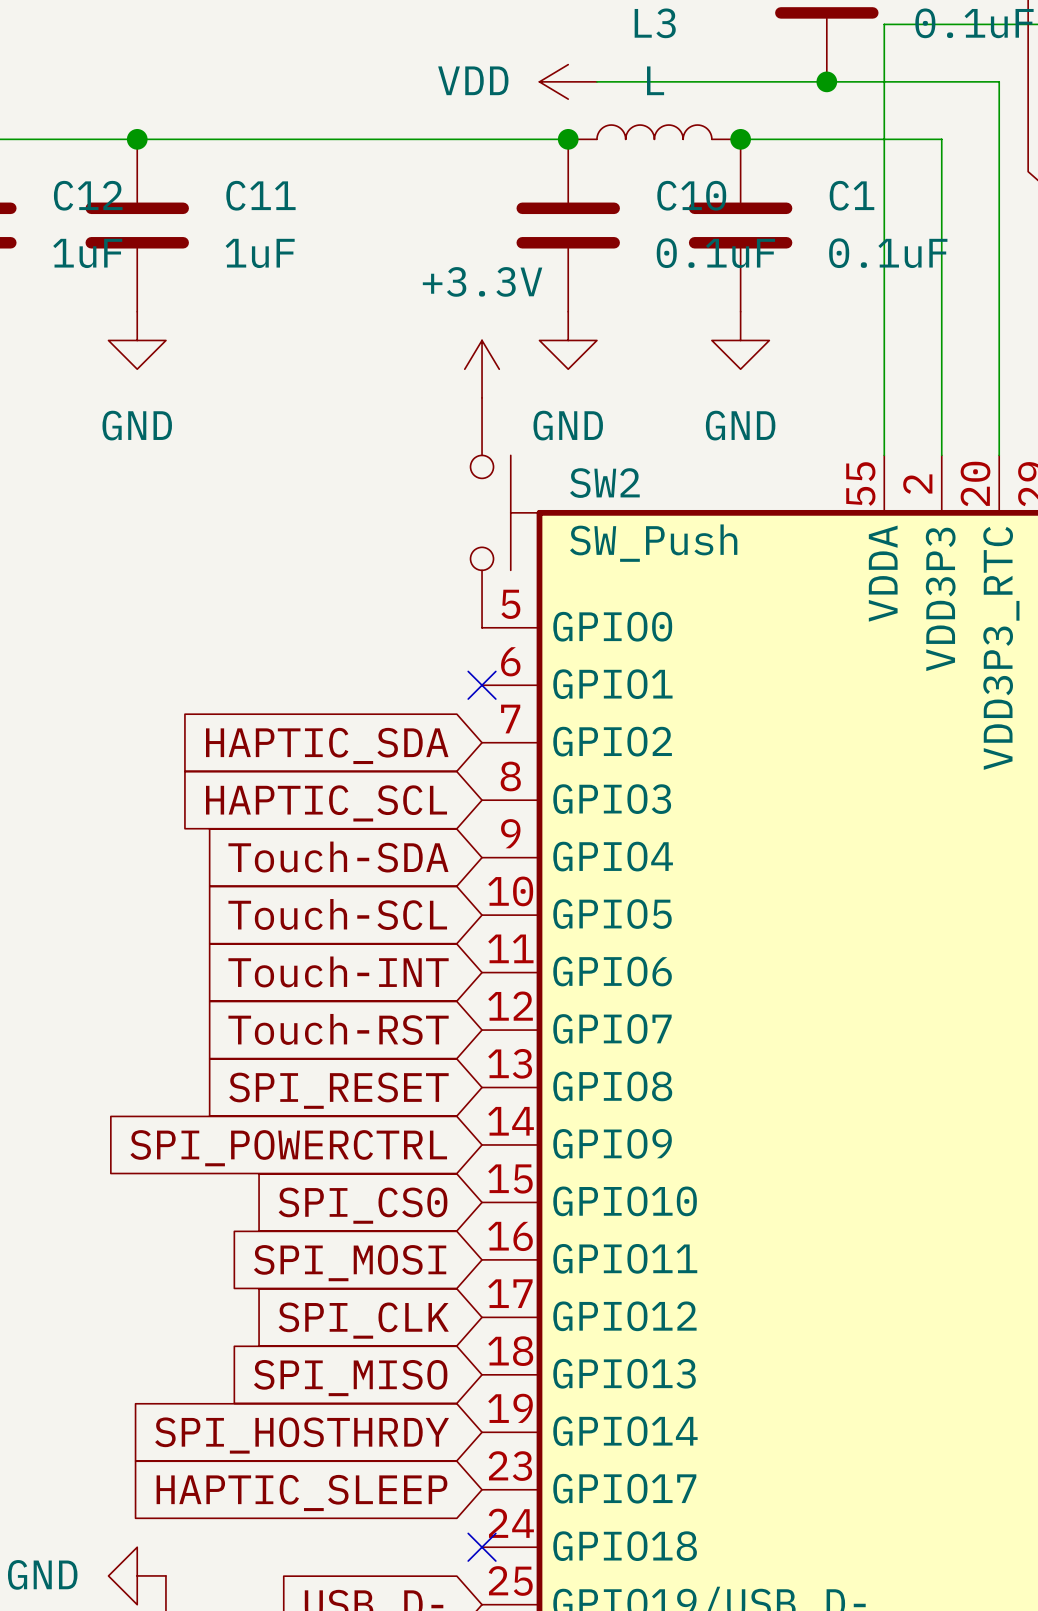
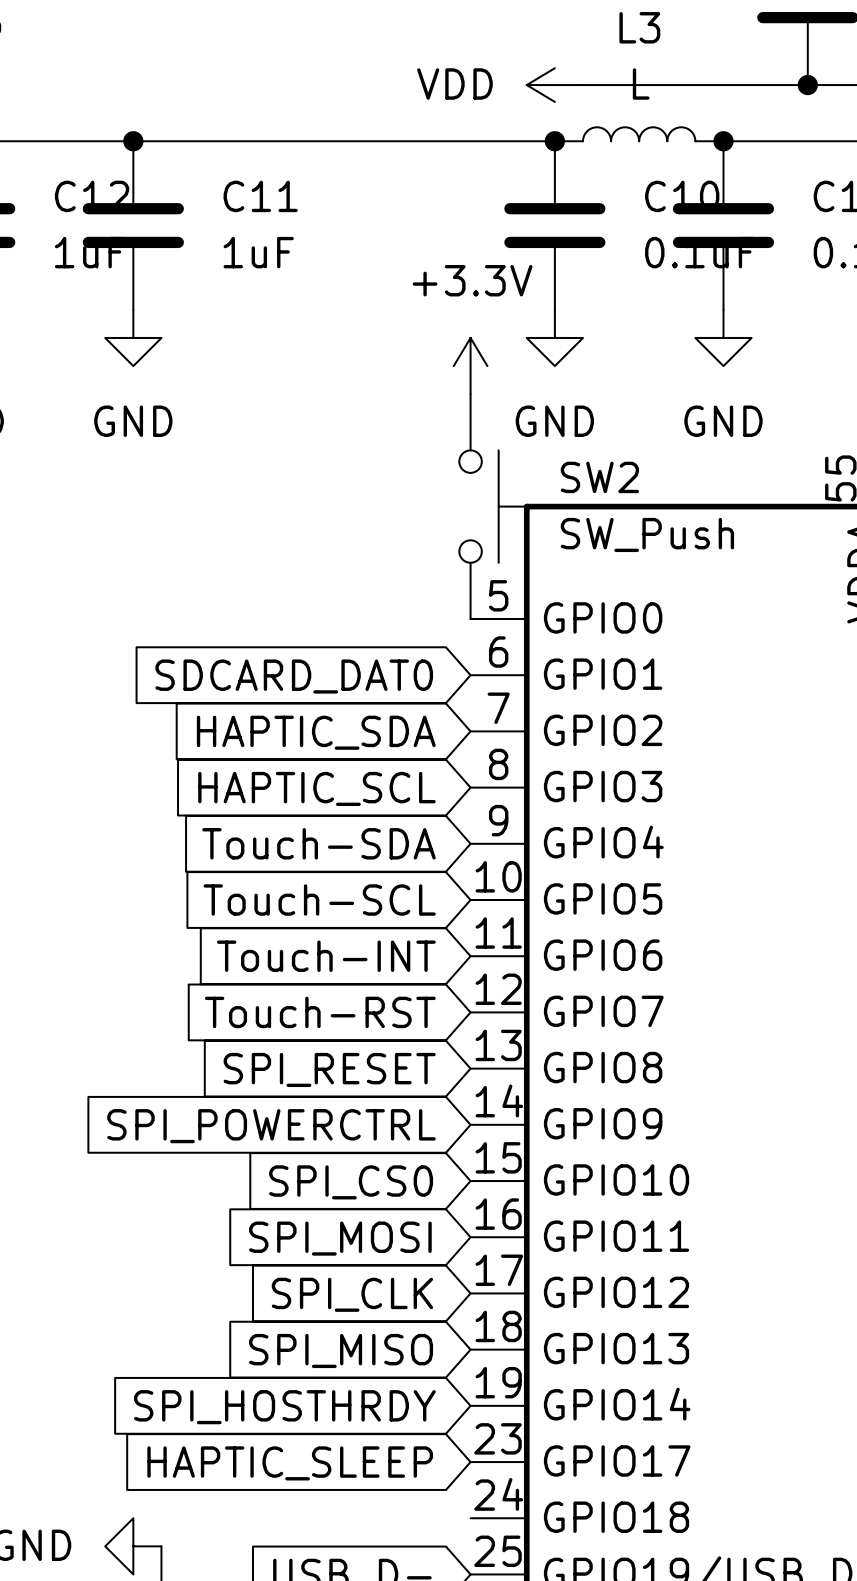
no-connect mark: (482, 685) -> none
global label: none -> SDCARD_DAT0 (294, 676)
no-connect mark: (482, 1547) -> none

